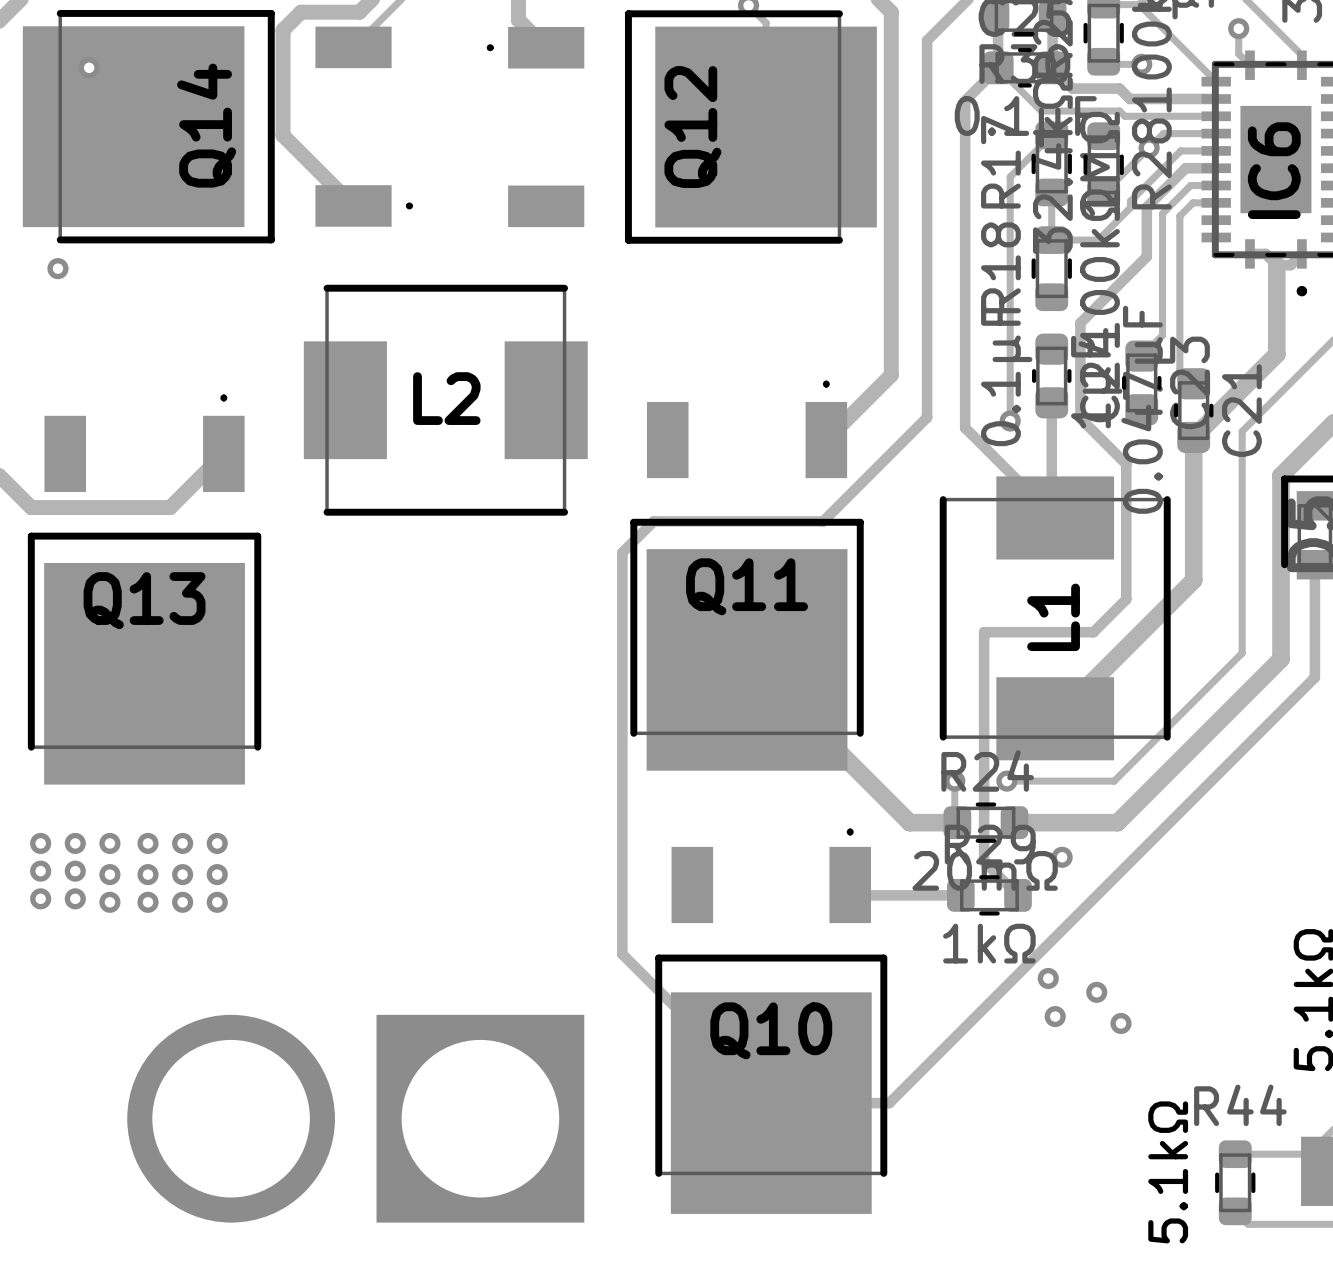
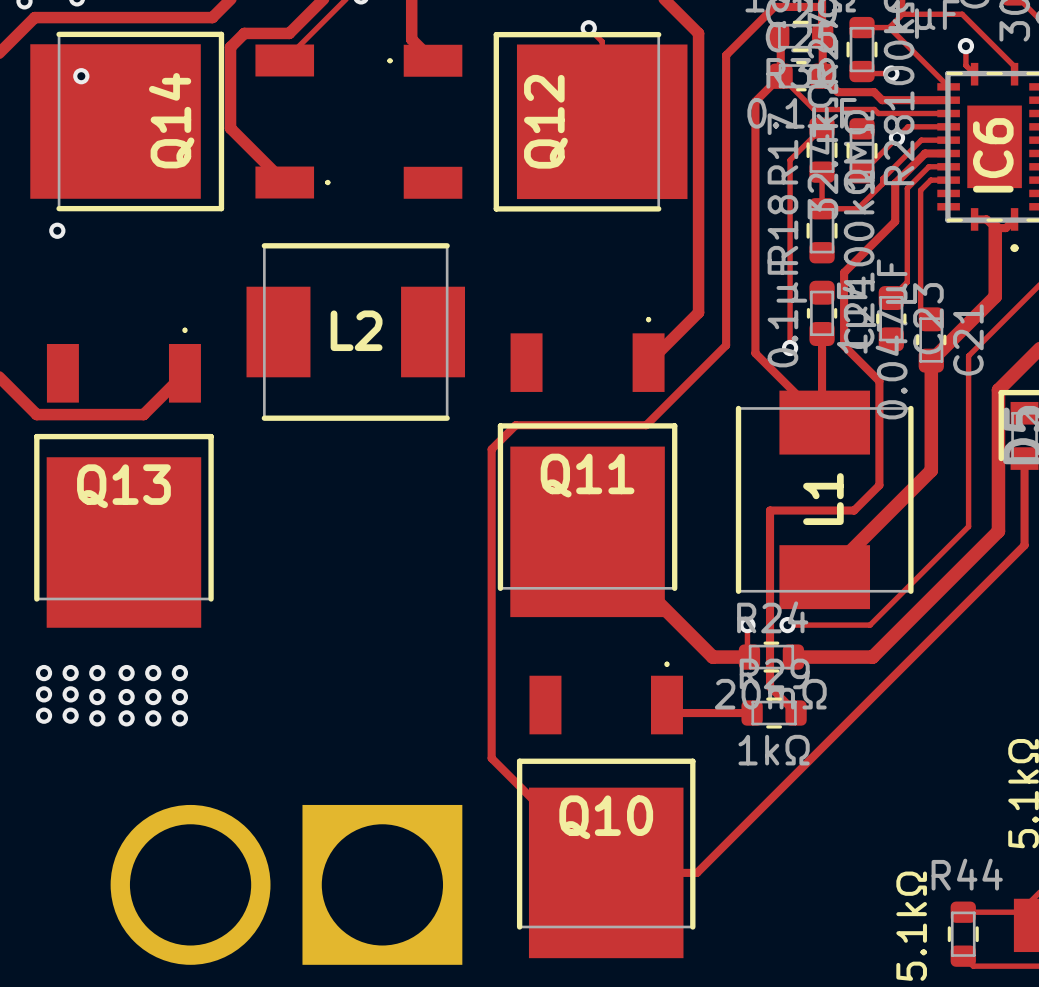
via: (1062, 857) -> none
via: (1048, 978) -> none
via: (1096, 992) -> none
via: (1055, 1016) -> none
via: (1120, 1023) -> none

